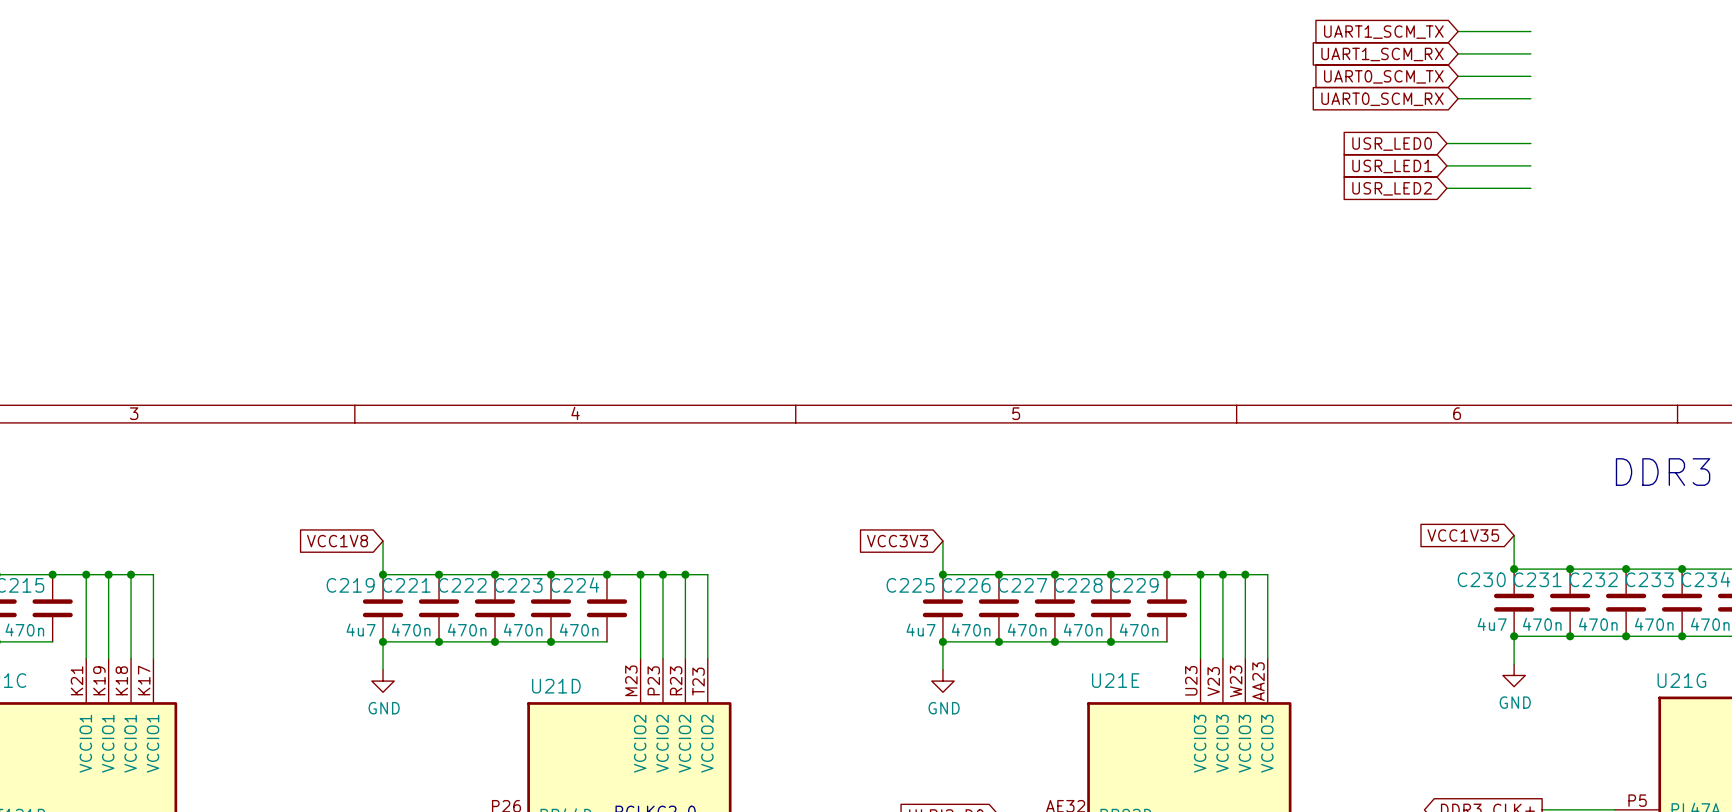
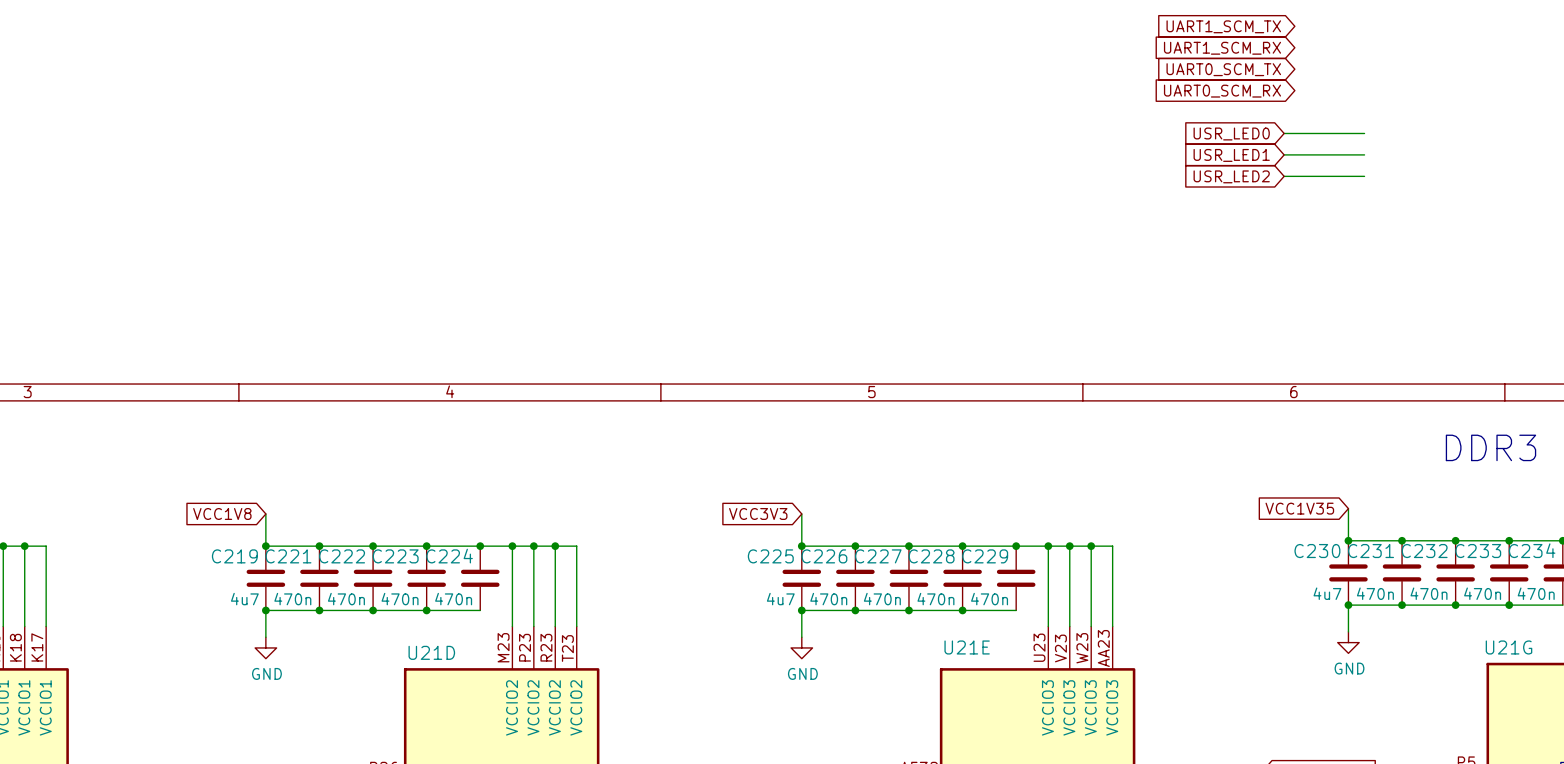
wire: (1458, 31) (1530, 31) -> none
wire: (1458, 53) (1530, 53) -> none
wire: (1458, 76) (1530, 76) -> none
wire: (1458, 98) (1530, 98) -> none

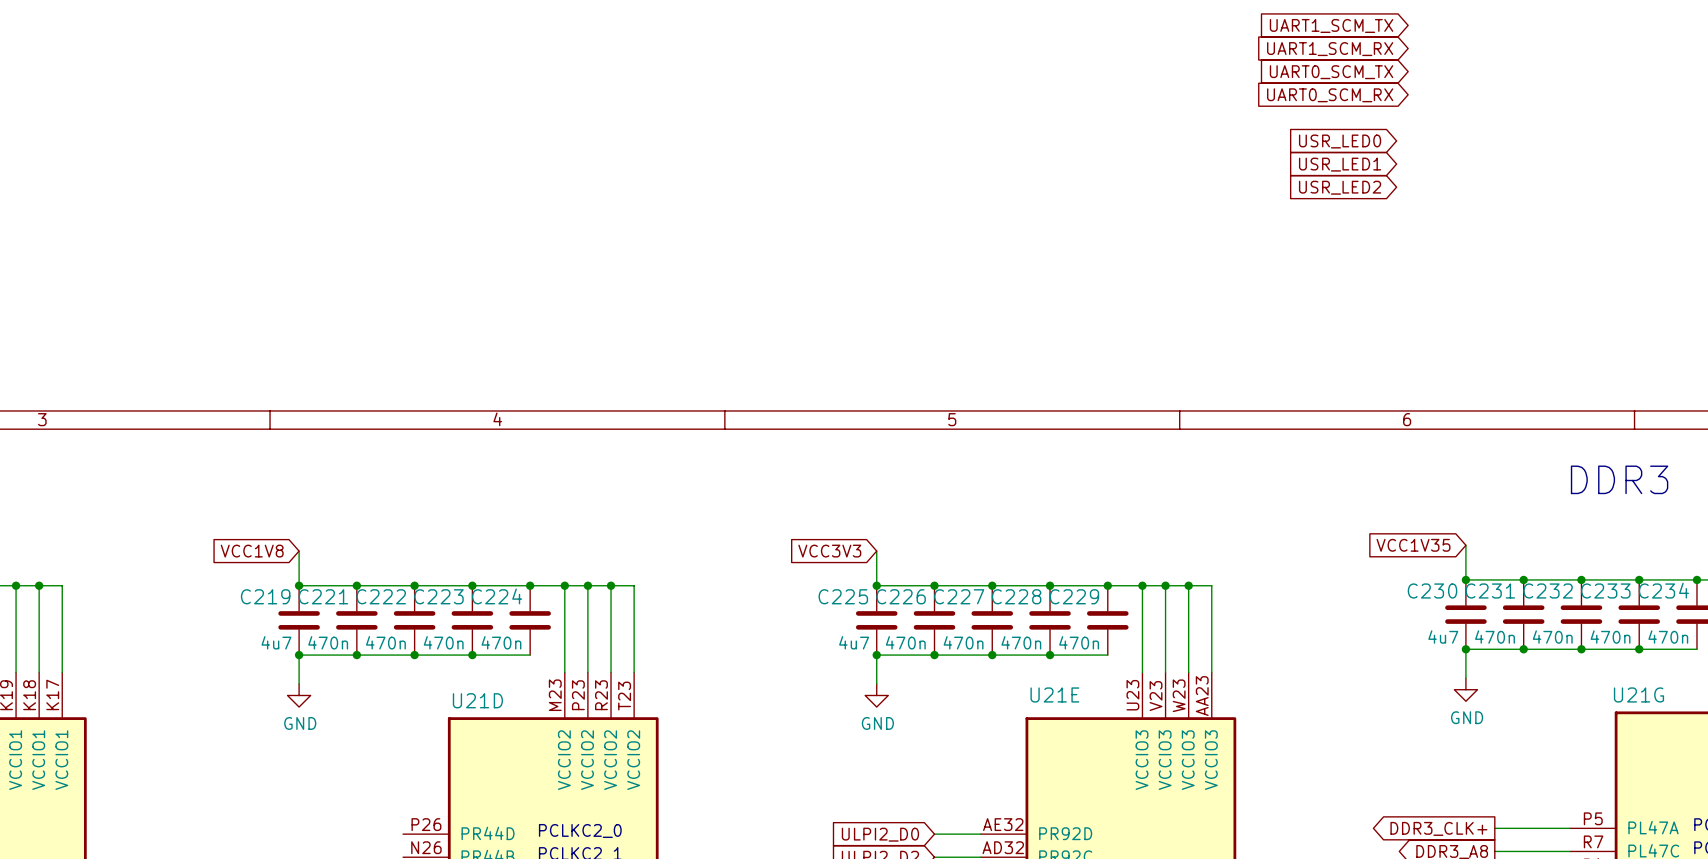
wire: (1284, 133) (1364, 133) -> none
wire: (1284, 154) (1364, 154) -> none
wire: (1284, 176) (1364, 176) -> none

